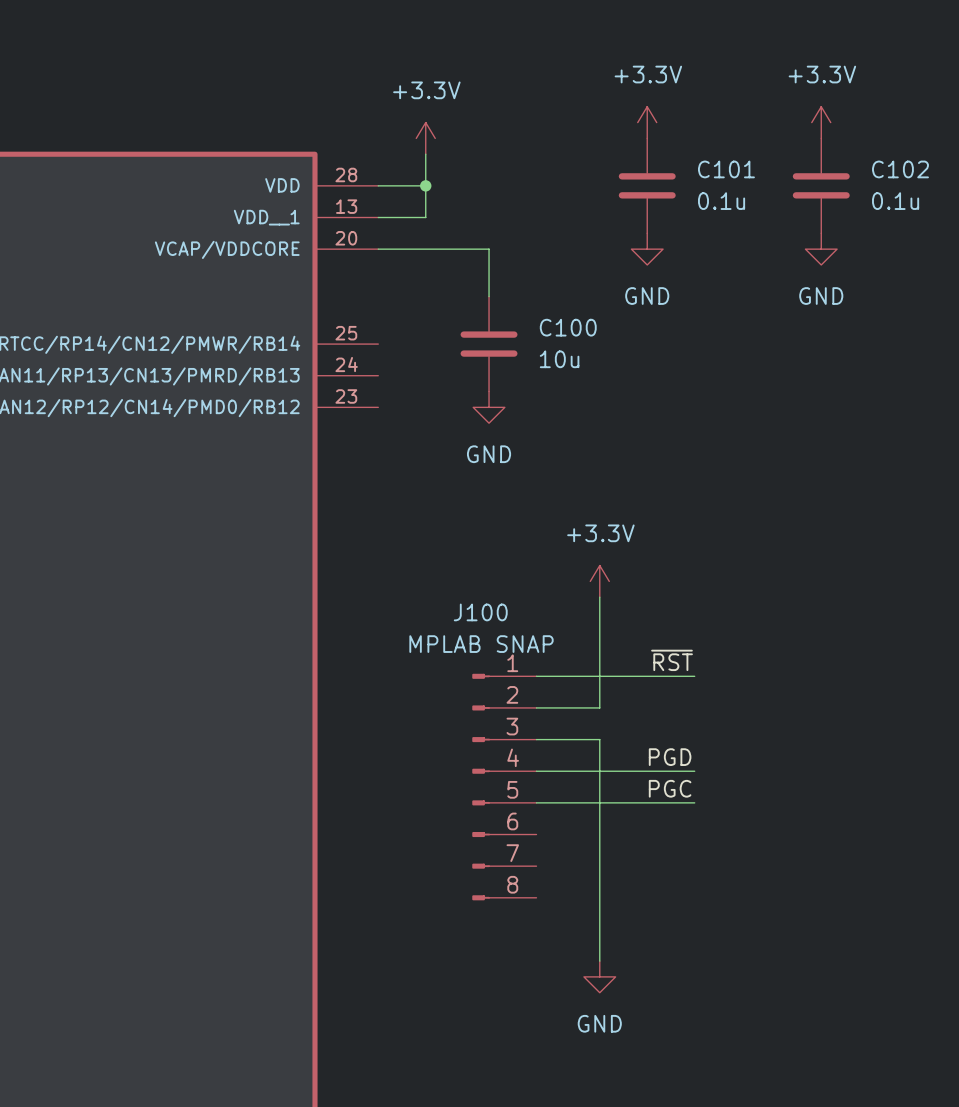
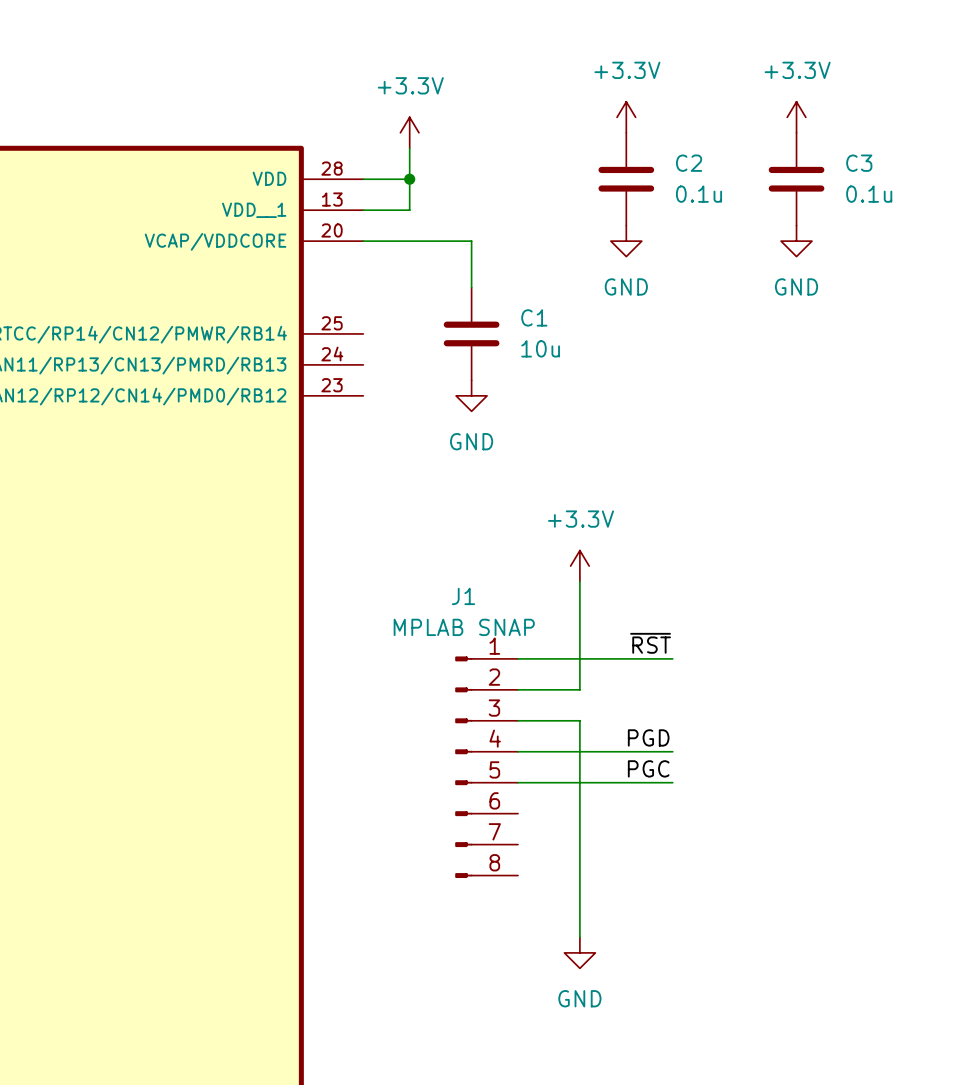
C101 name: C101 (726, 169) -> C2 (689, 163)
C102 name: C102 (900, 169) -> C3 (859, 163)
C100 name: C100 (568, 327) -> C1 (534, 317)
J100 name: J100 (480, 612) -> J1 (463, 596)

